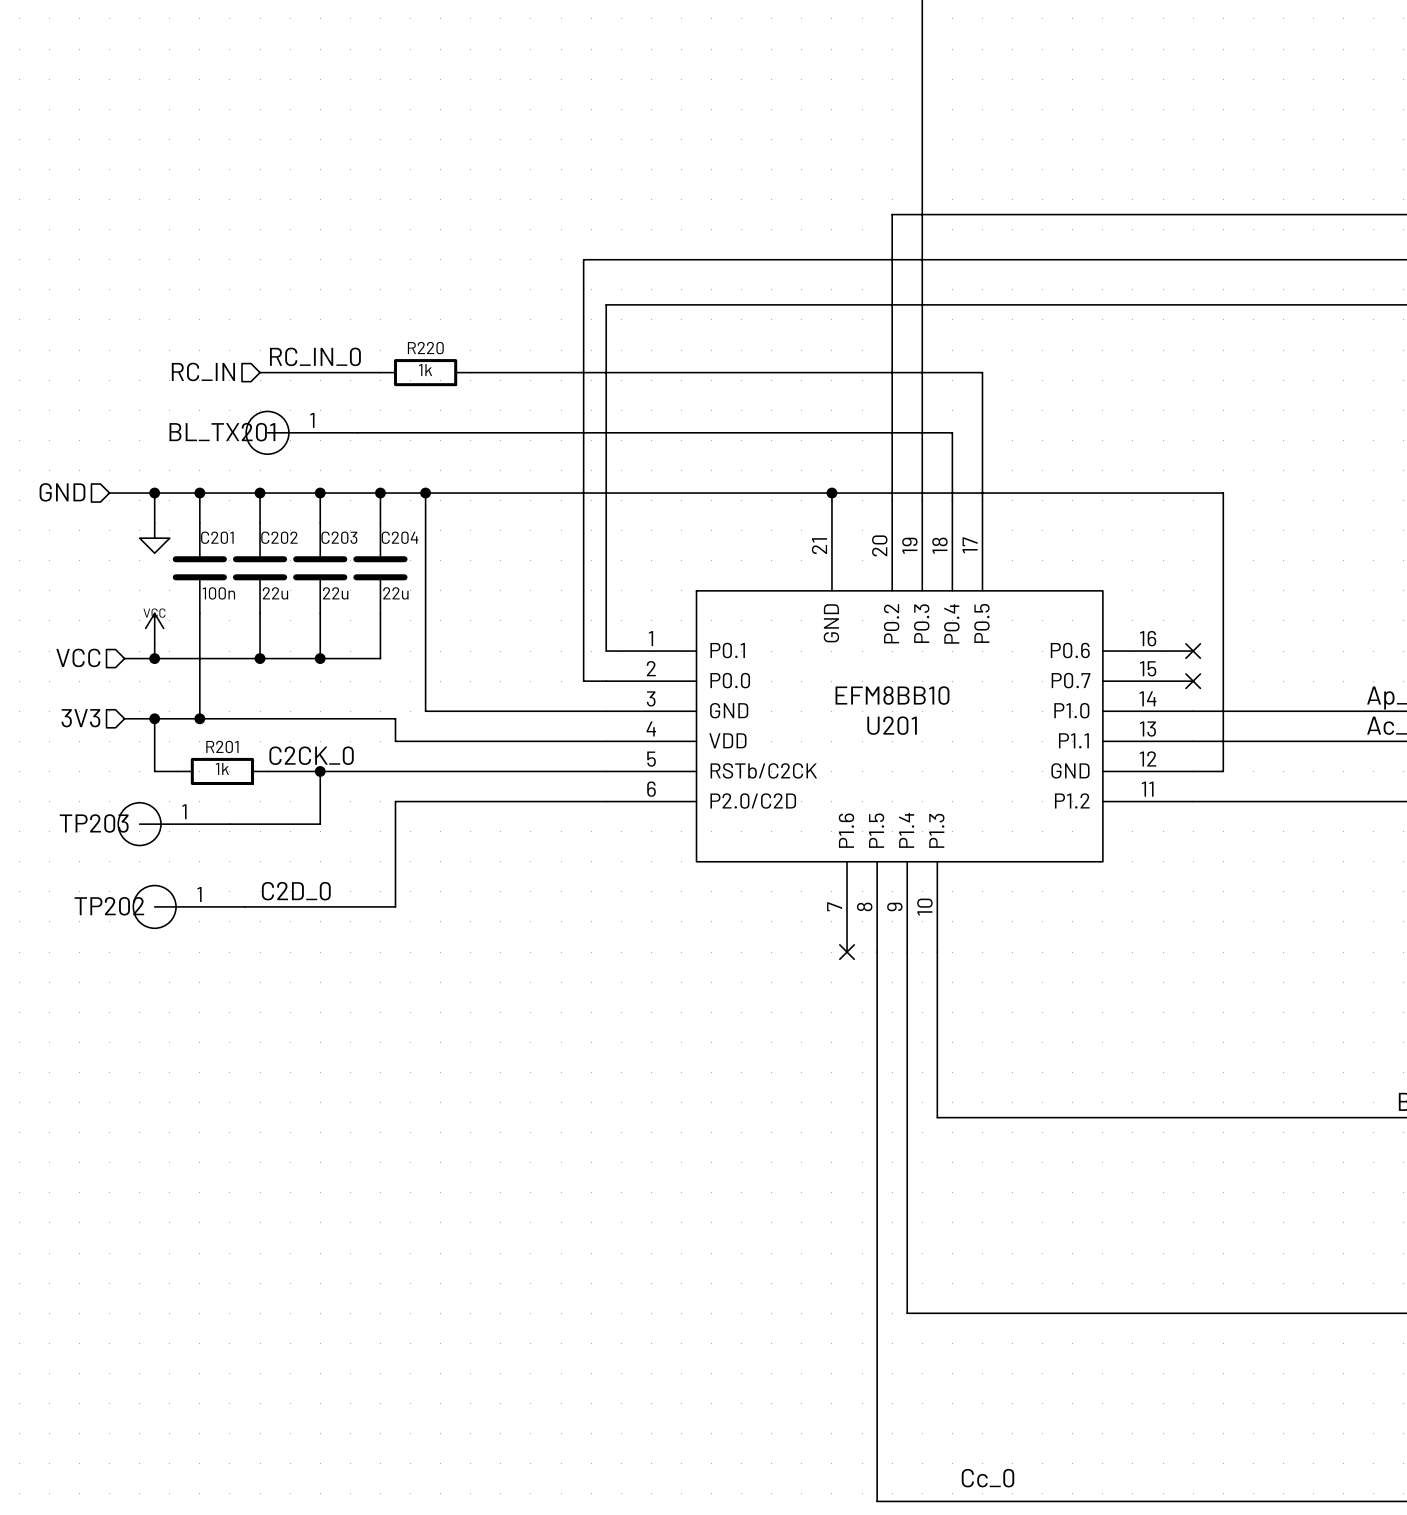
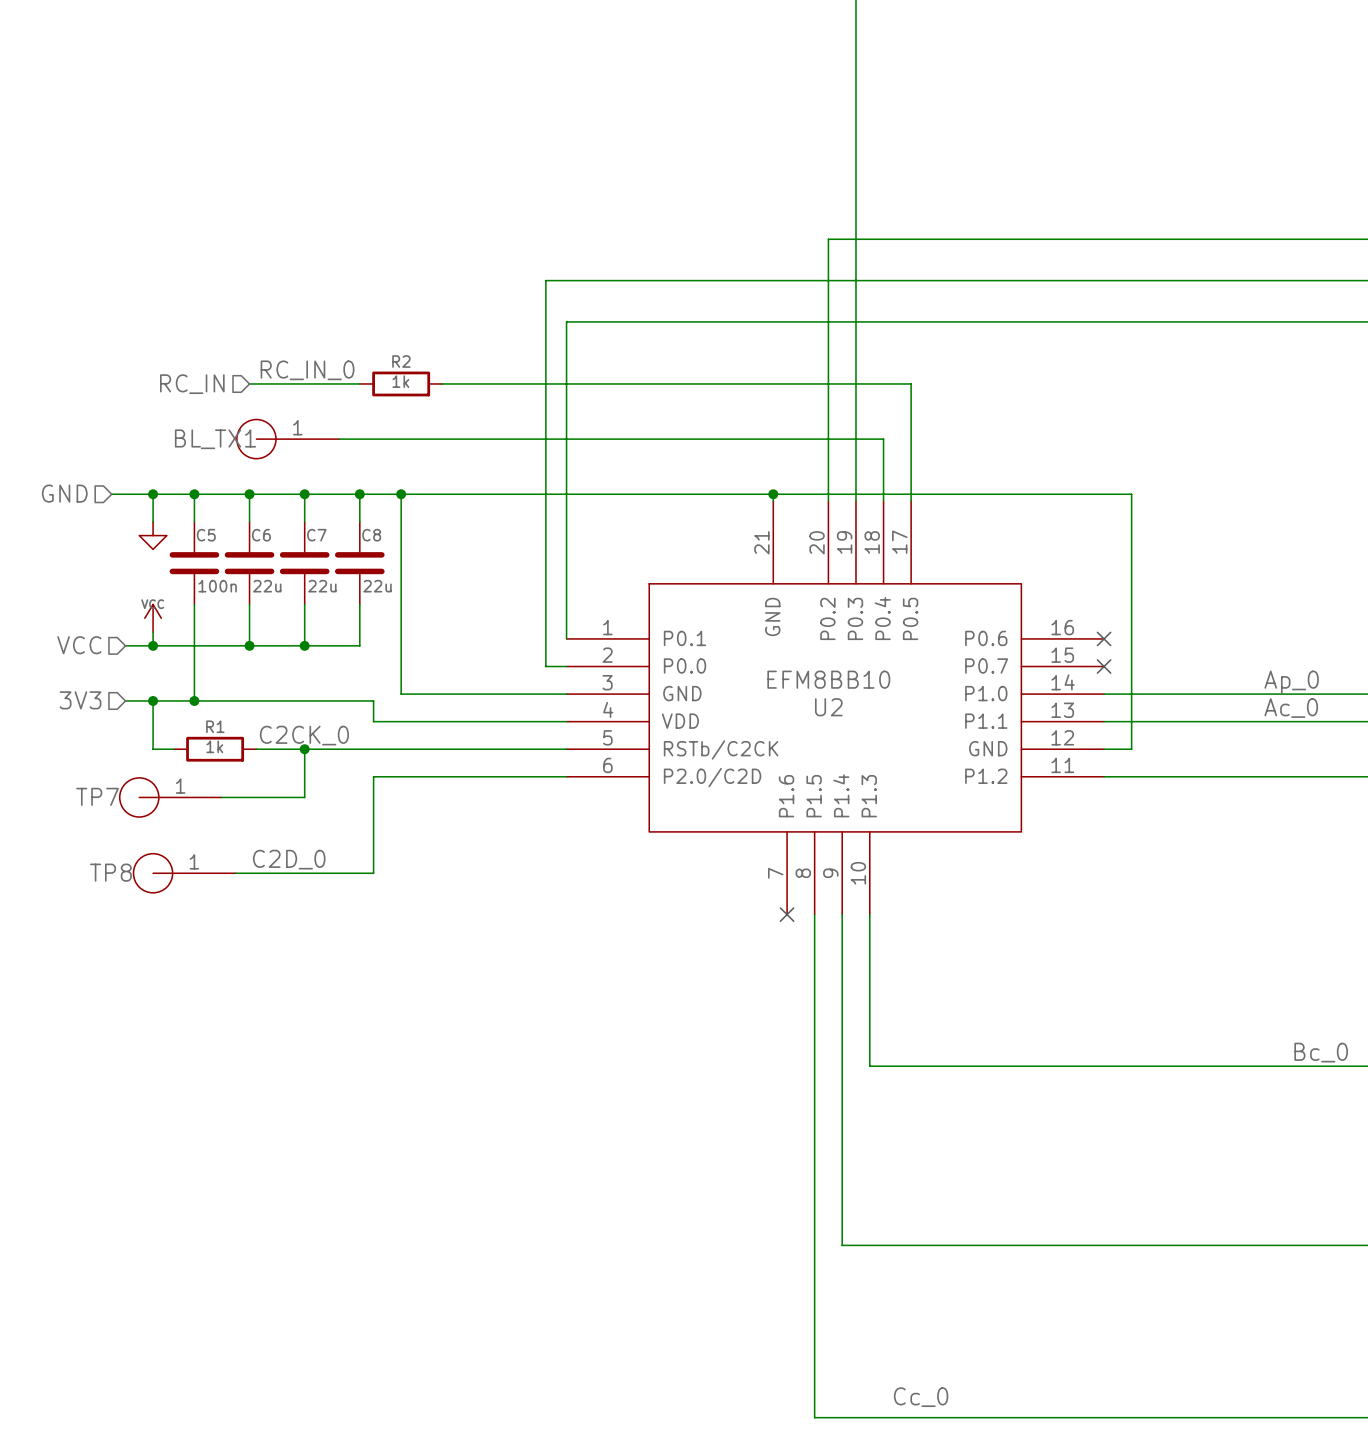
R220 name: R220 (425, 348) -> R2 (401, 361)
BL_TX201 name: BL_TX201 (222, 432) -> BL_TX1 (215, 439)
C201 name: C201 (217, 537) -> C5 (206, 535)
C202 name: C202 (279, 537) -> C6 (261, 535)
C203 name: C203 (339, 537) -> C7 (316, 535)
C204 name: C204 (399, 537) -> C8 (371, 535)
U201 name: U201 (892, 725) -> U2 (828, 707)
R201 name: R201 (222, 746) -> R1 (215, 726)
TP203 name: TP203 (94, 823) -> TP7 (97, 796)
TP202 name: TP202 (109, 906) -> TP8 (110, 872)

